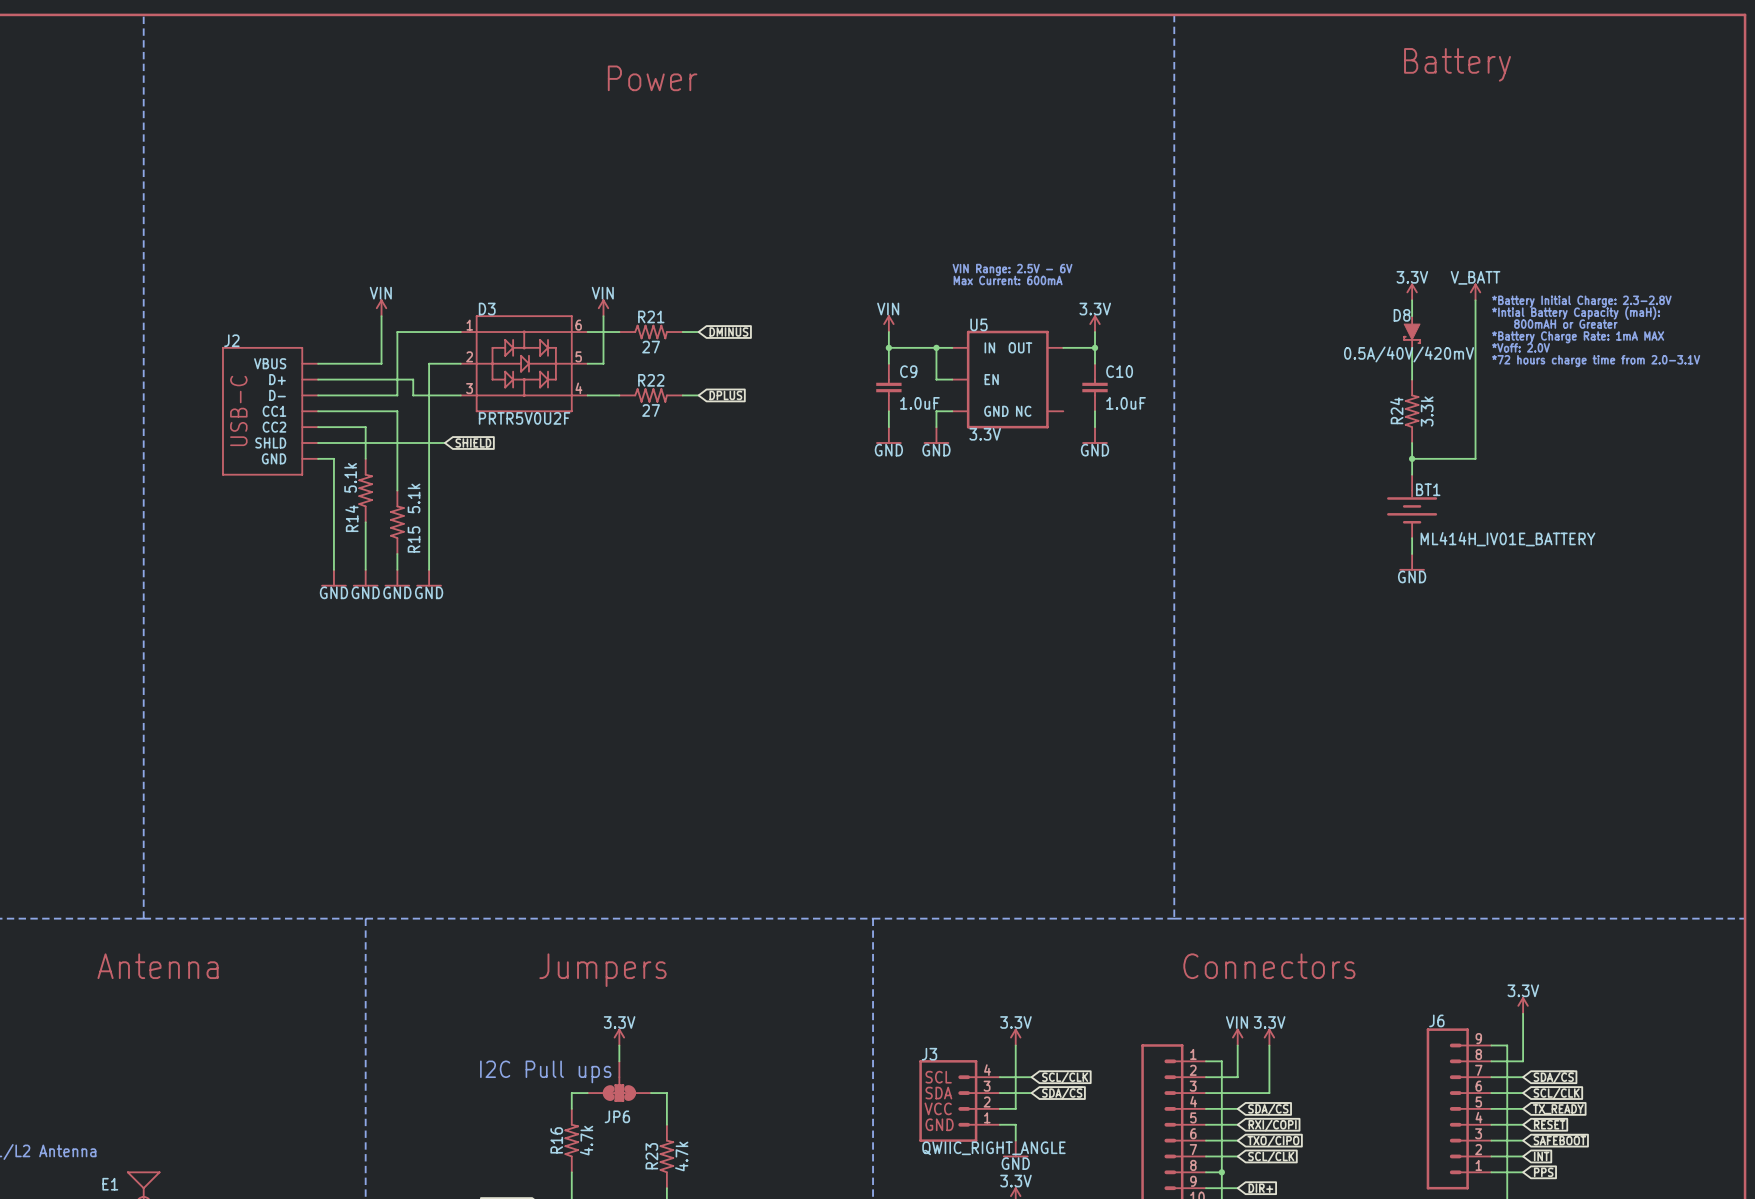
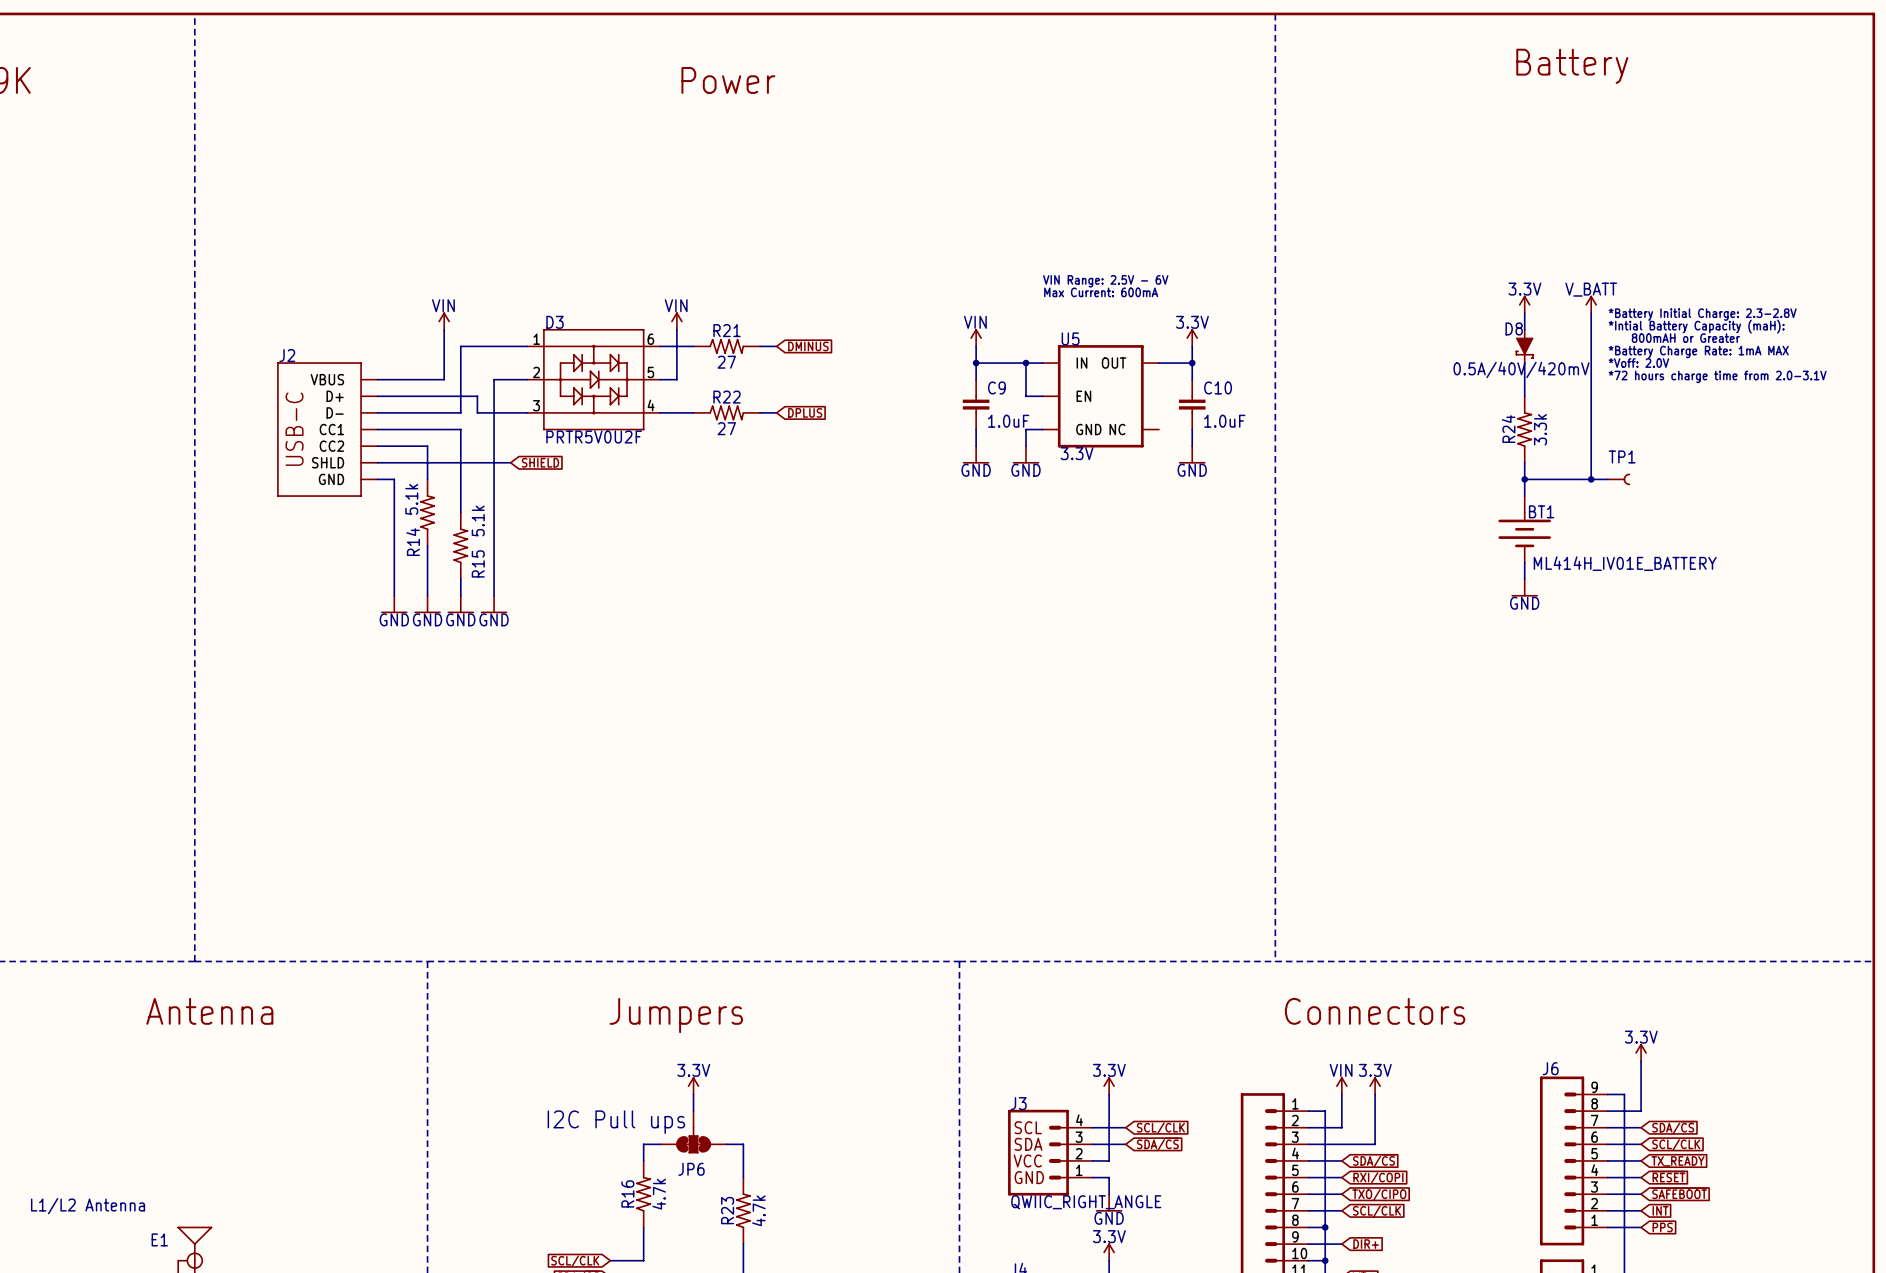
wire: none -> (1591, 479) (1607, 479)
junction: none -> (1591, 479)
TP1: none -> (1618, 479)

